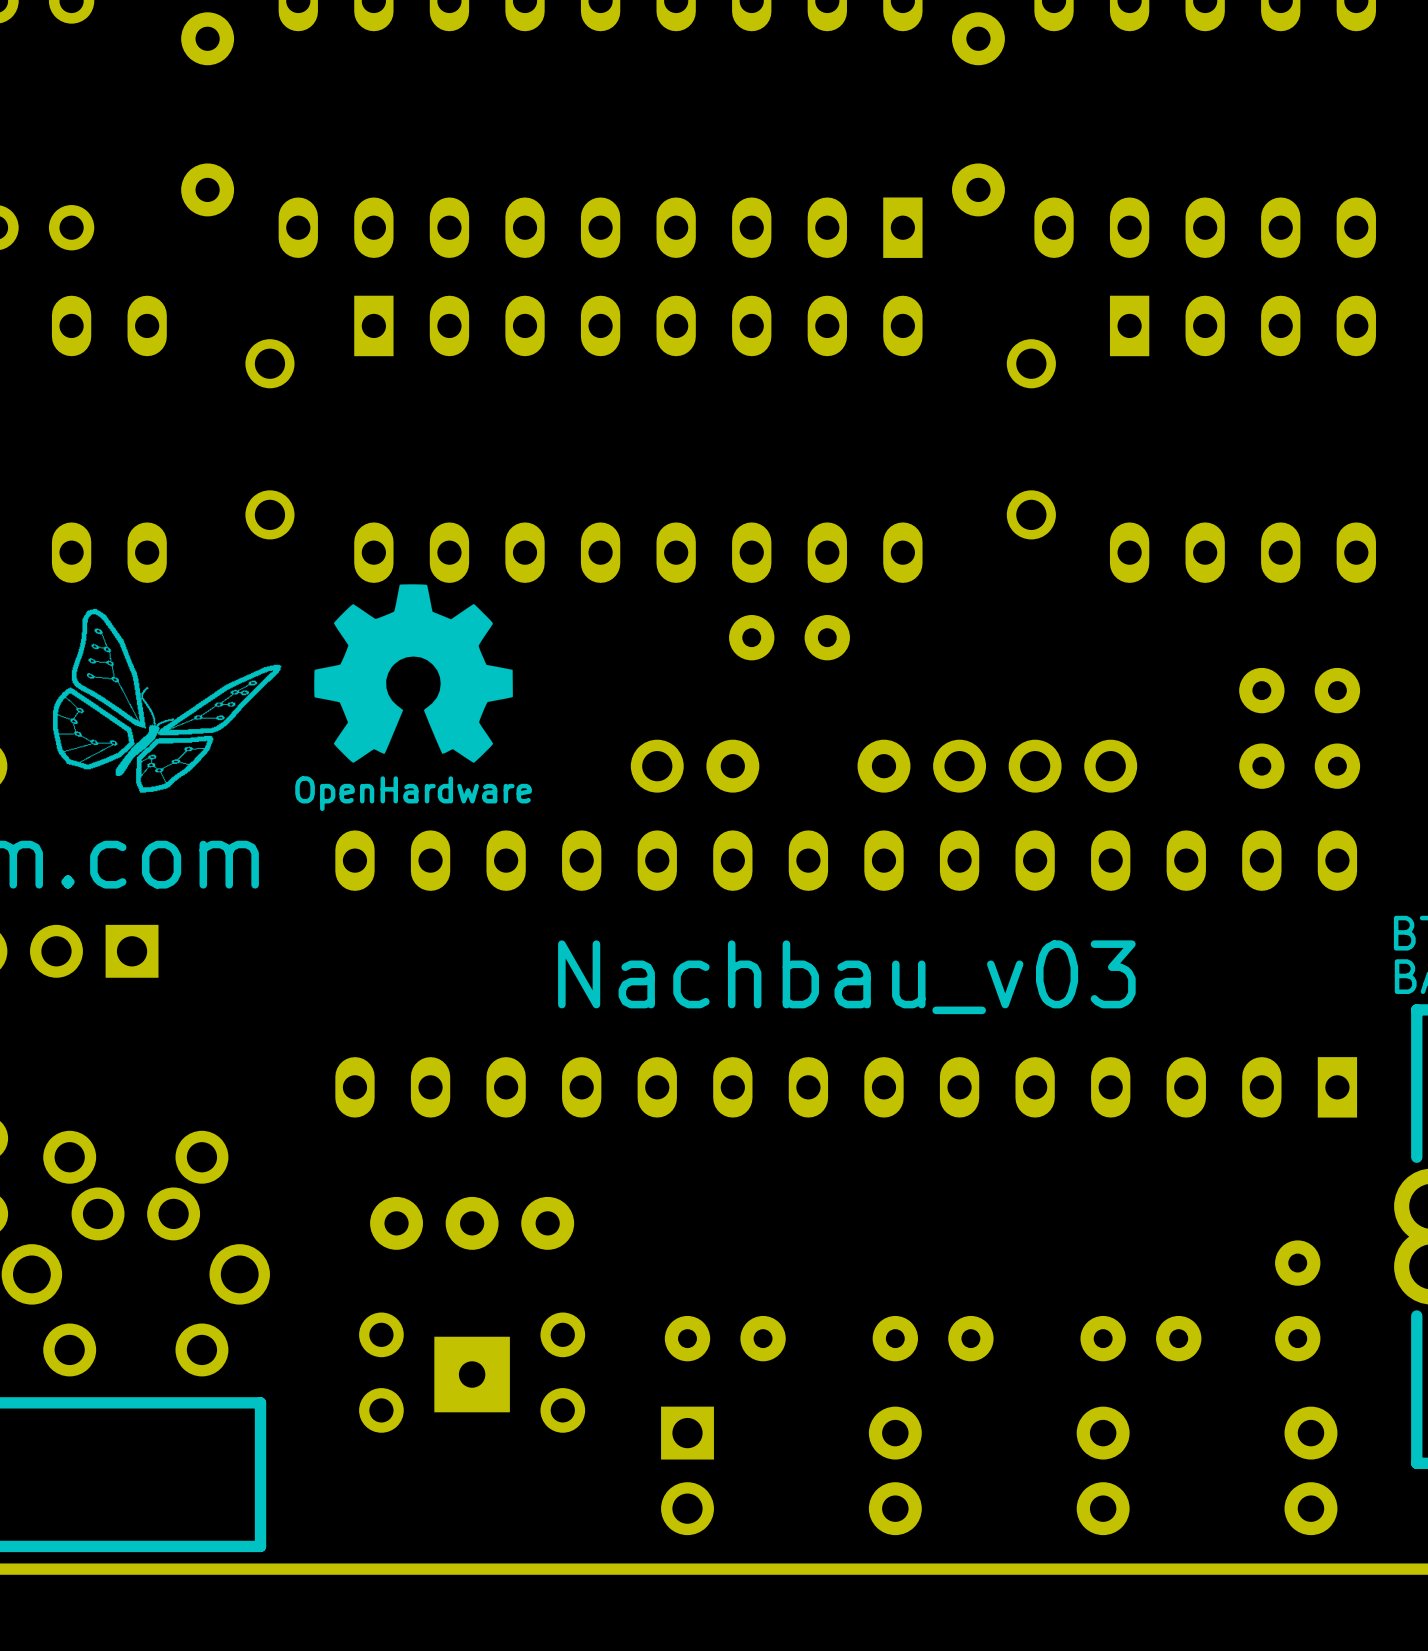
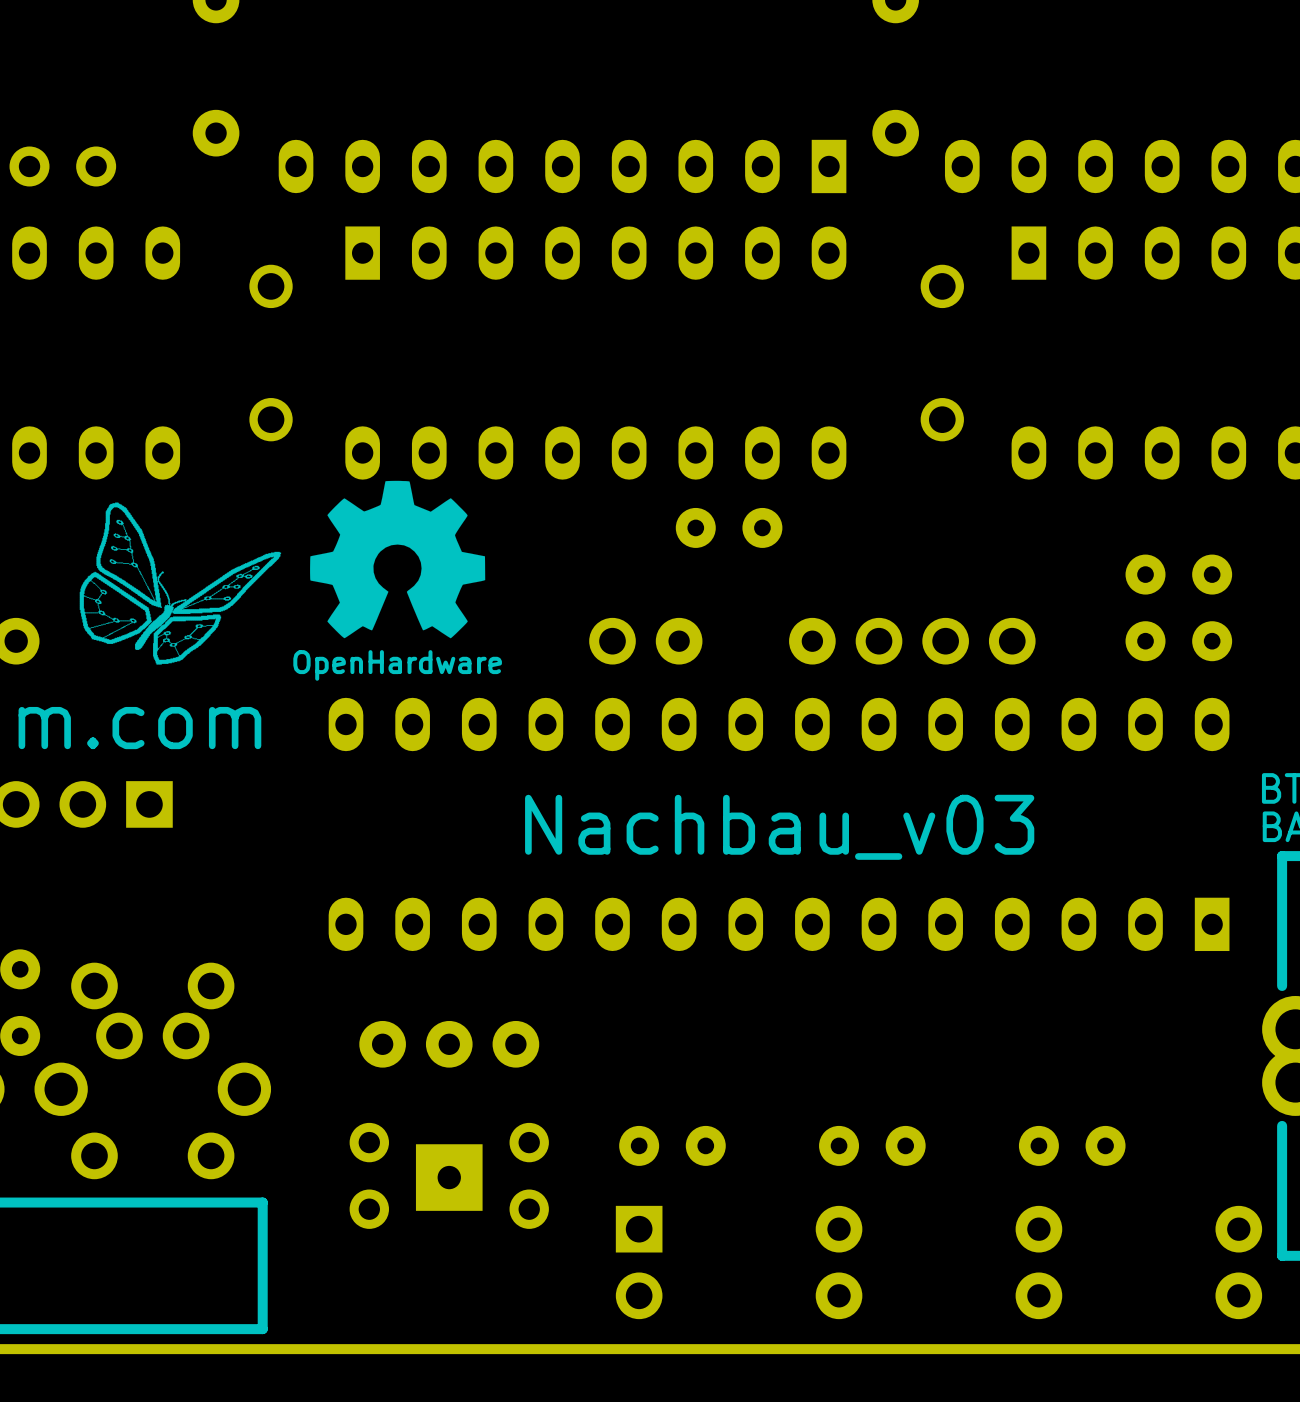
part: (1297, 1300) -> none
part position: (933, 1338) -> (872, 1145)
part position: (1140, 1338) -> (1072, 1145)
part position: (895, 1470) -> (839, 1262)
part position: (1103, 1470) -> (1038, 1262)
part position: (1310, 1470) -> (1238, 1262)

